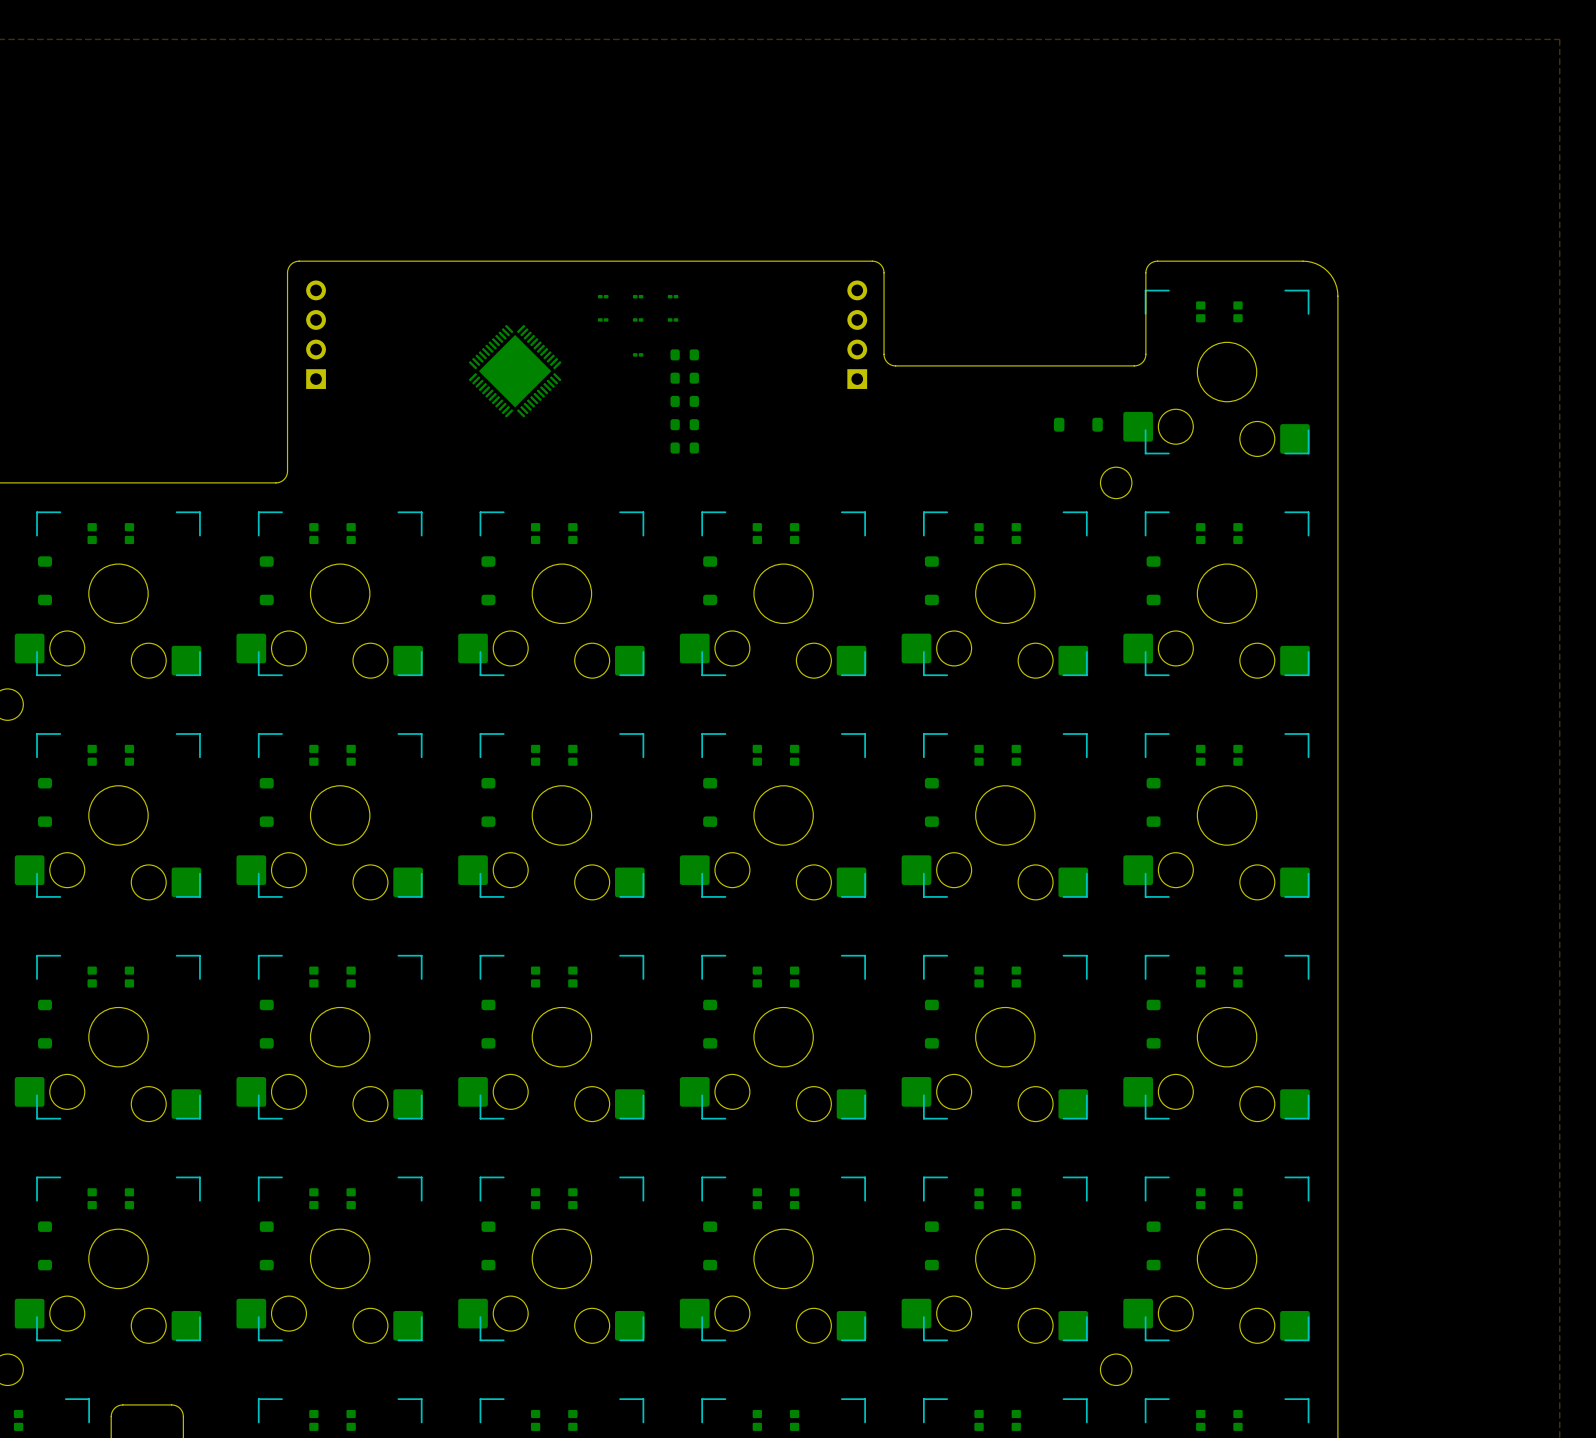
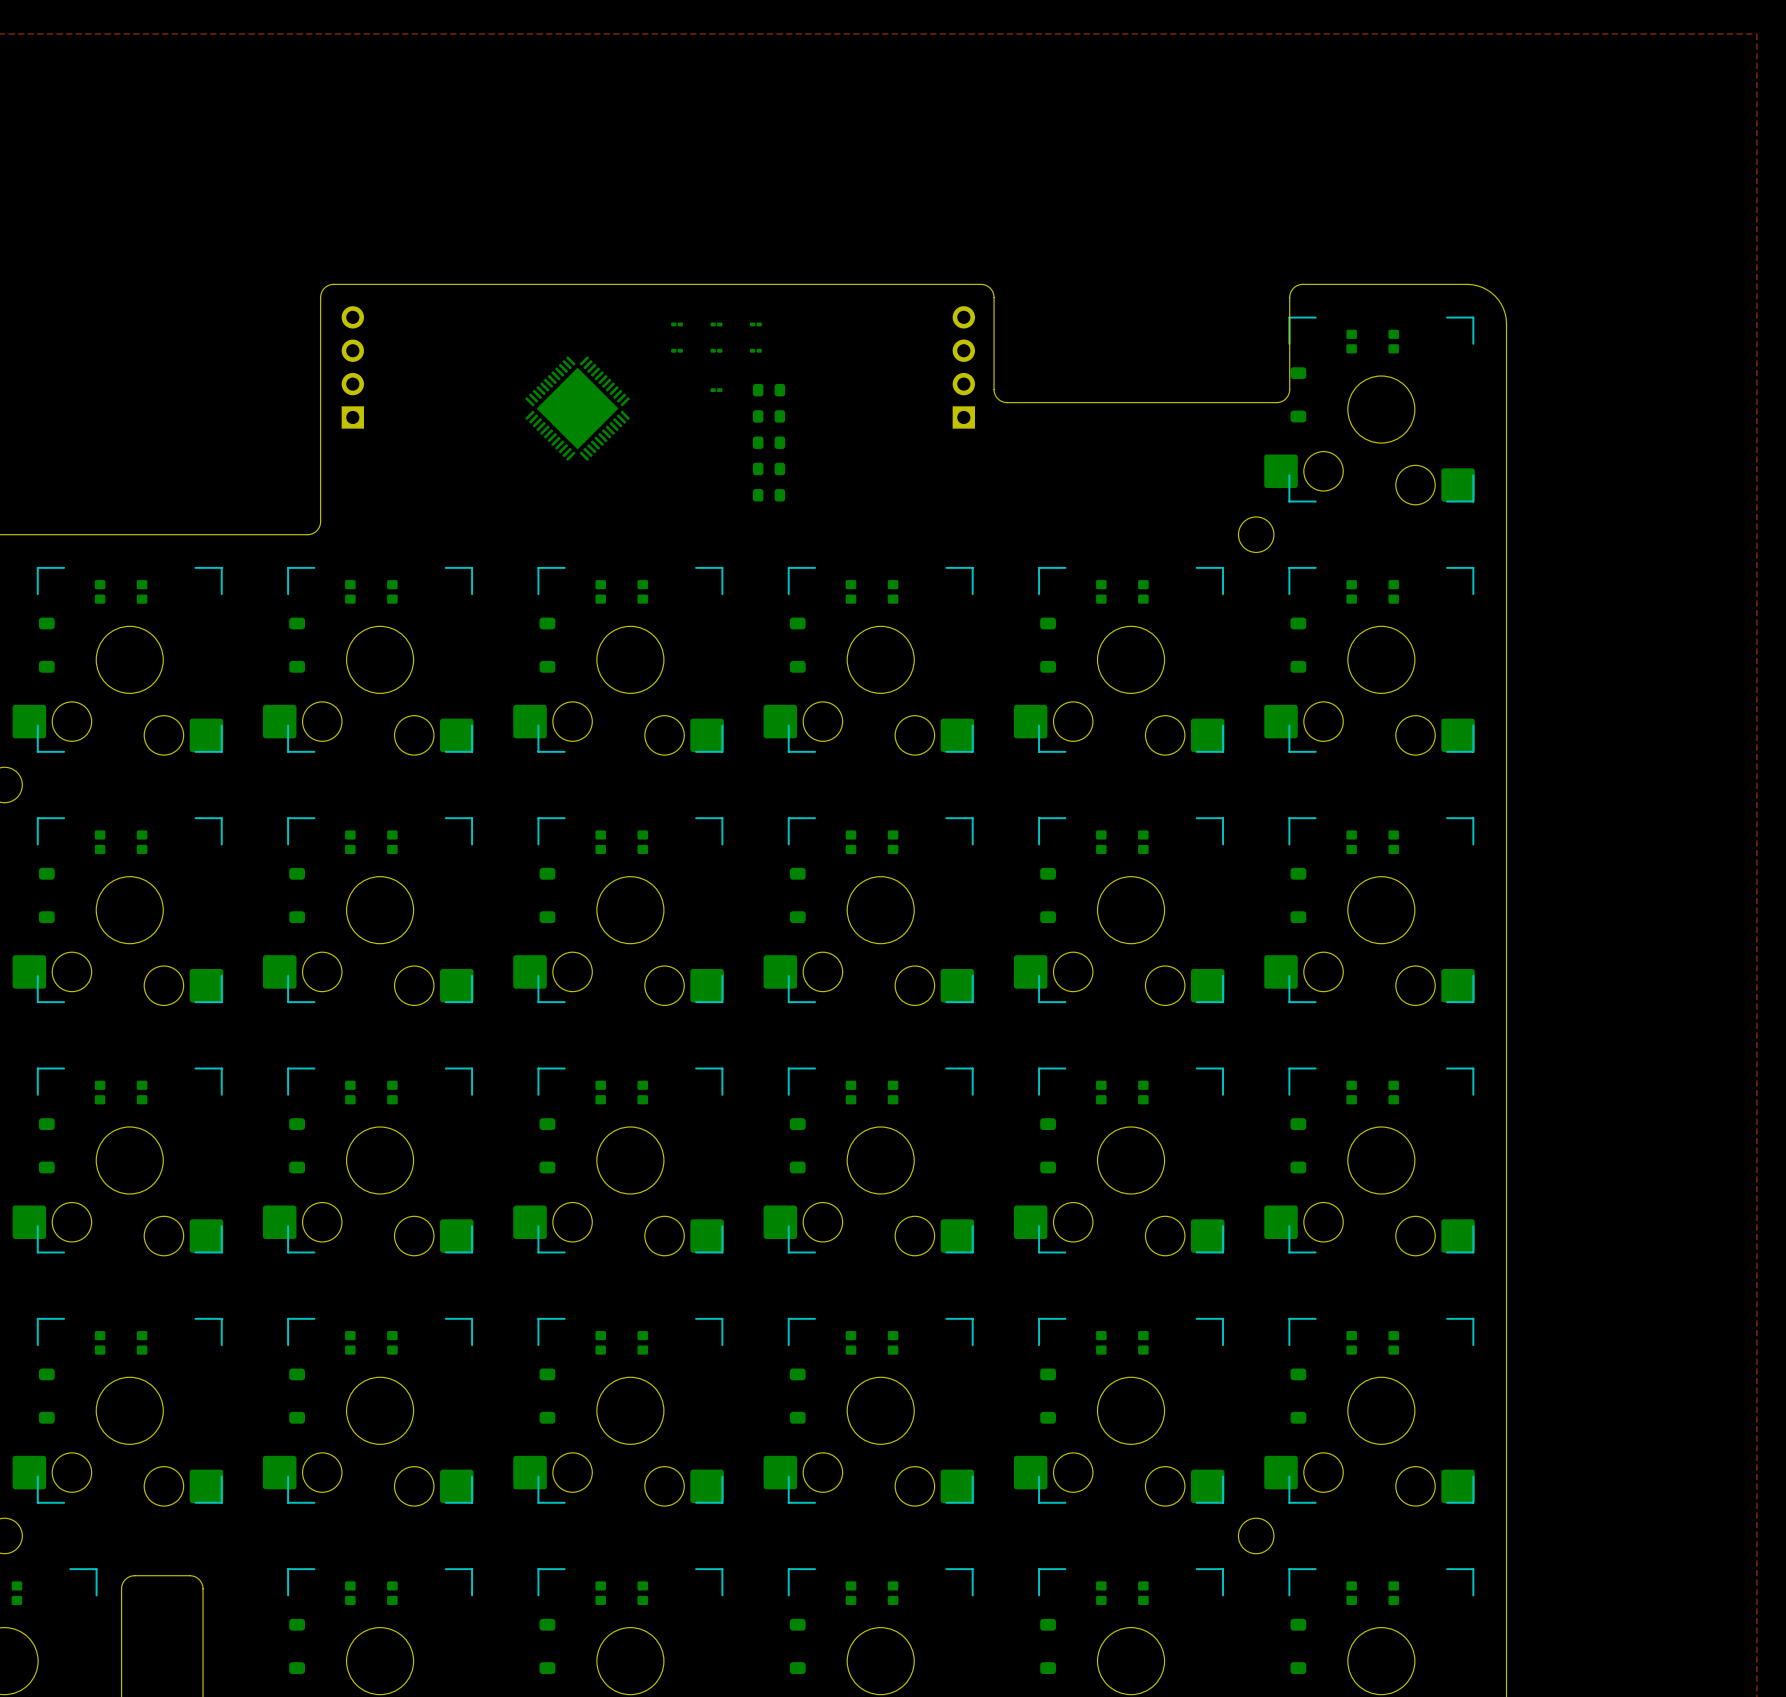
part rotation: 0° (1078, 424) -> 90° clockwise (1298, 394)
part position: (1078, 424) -> (1298, 394)

